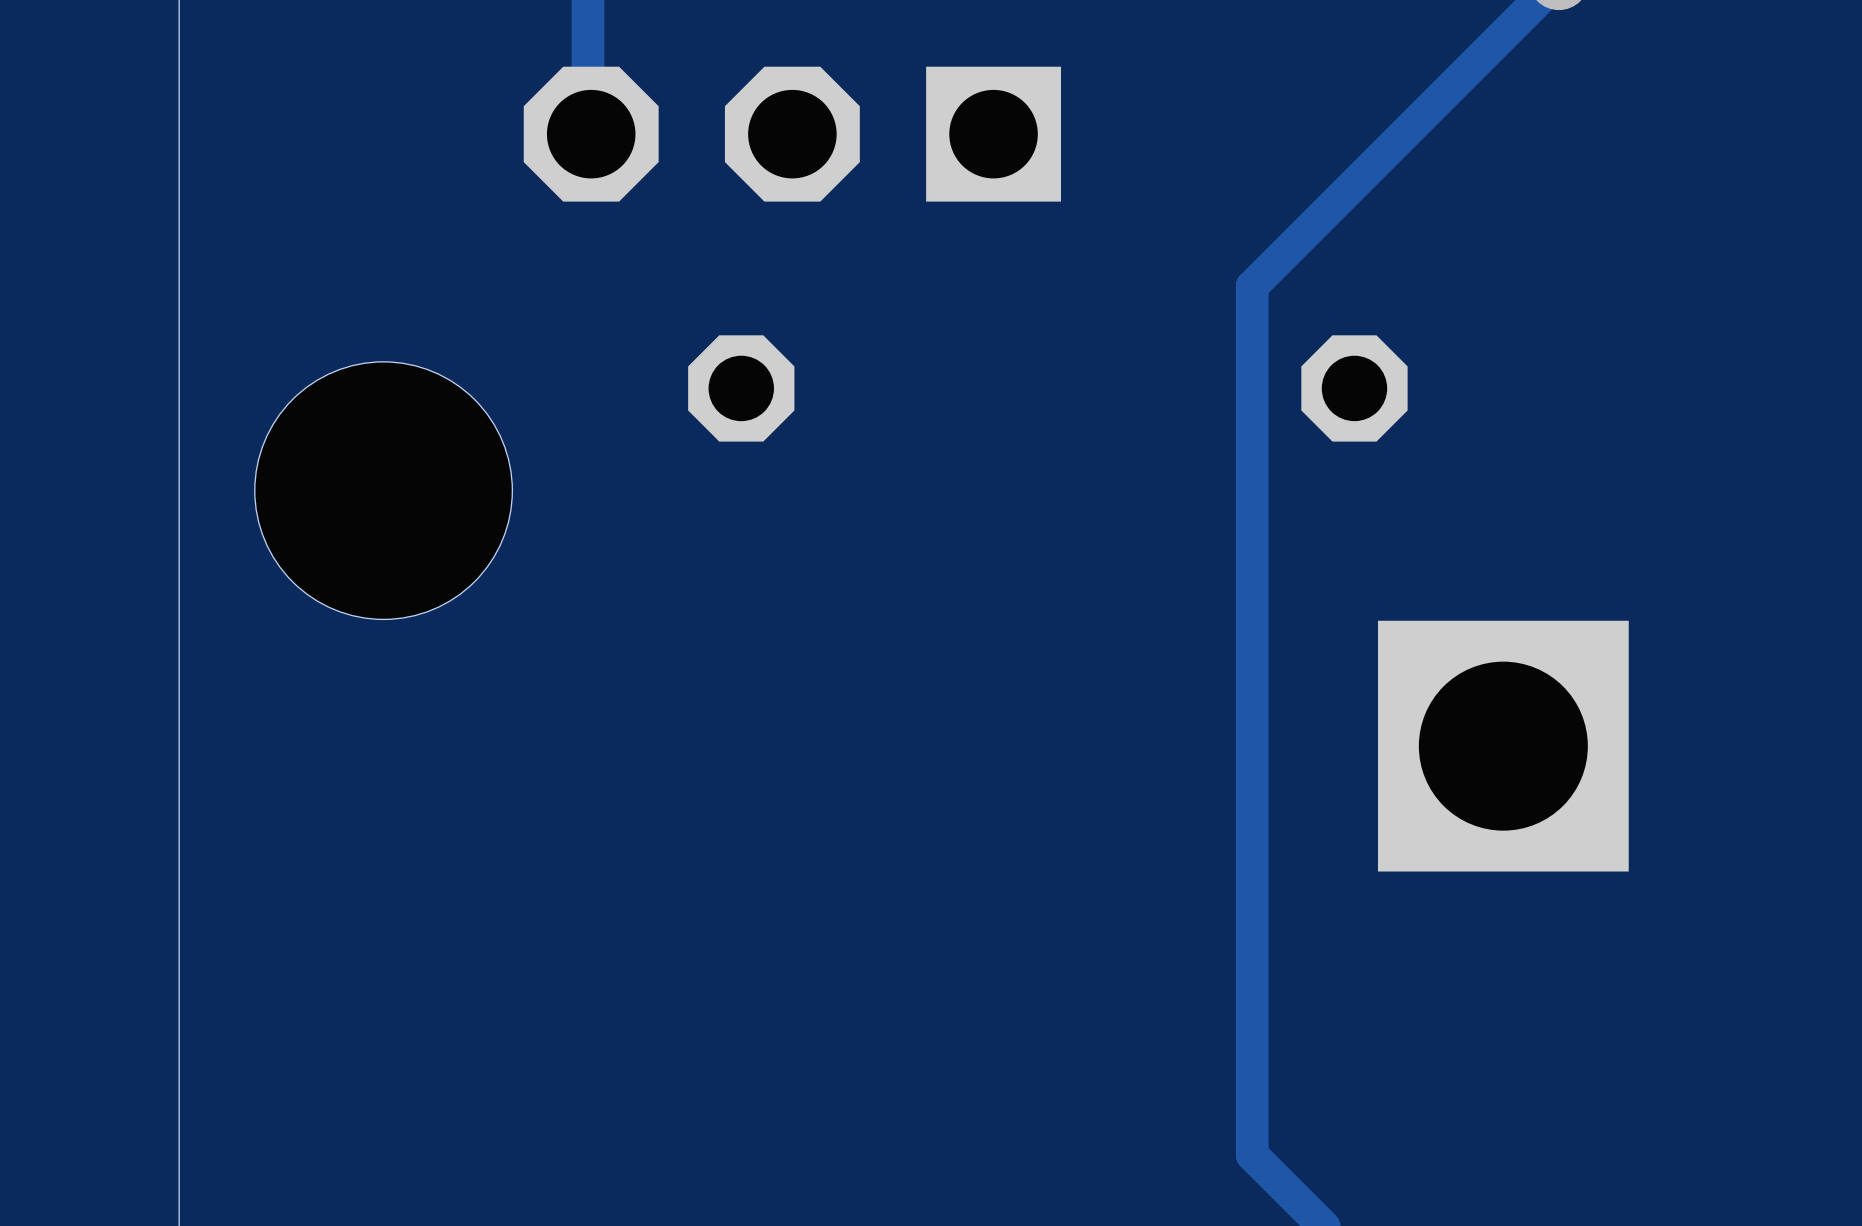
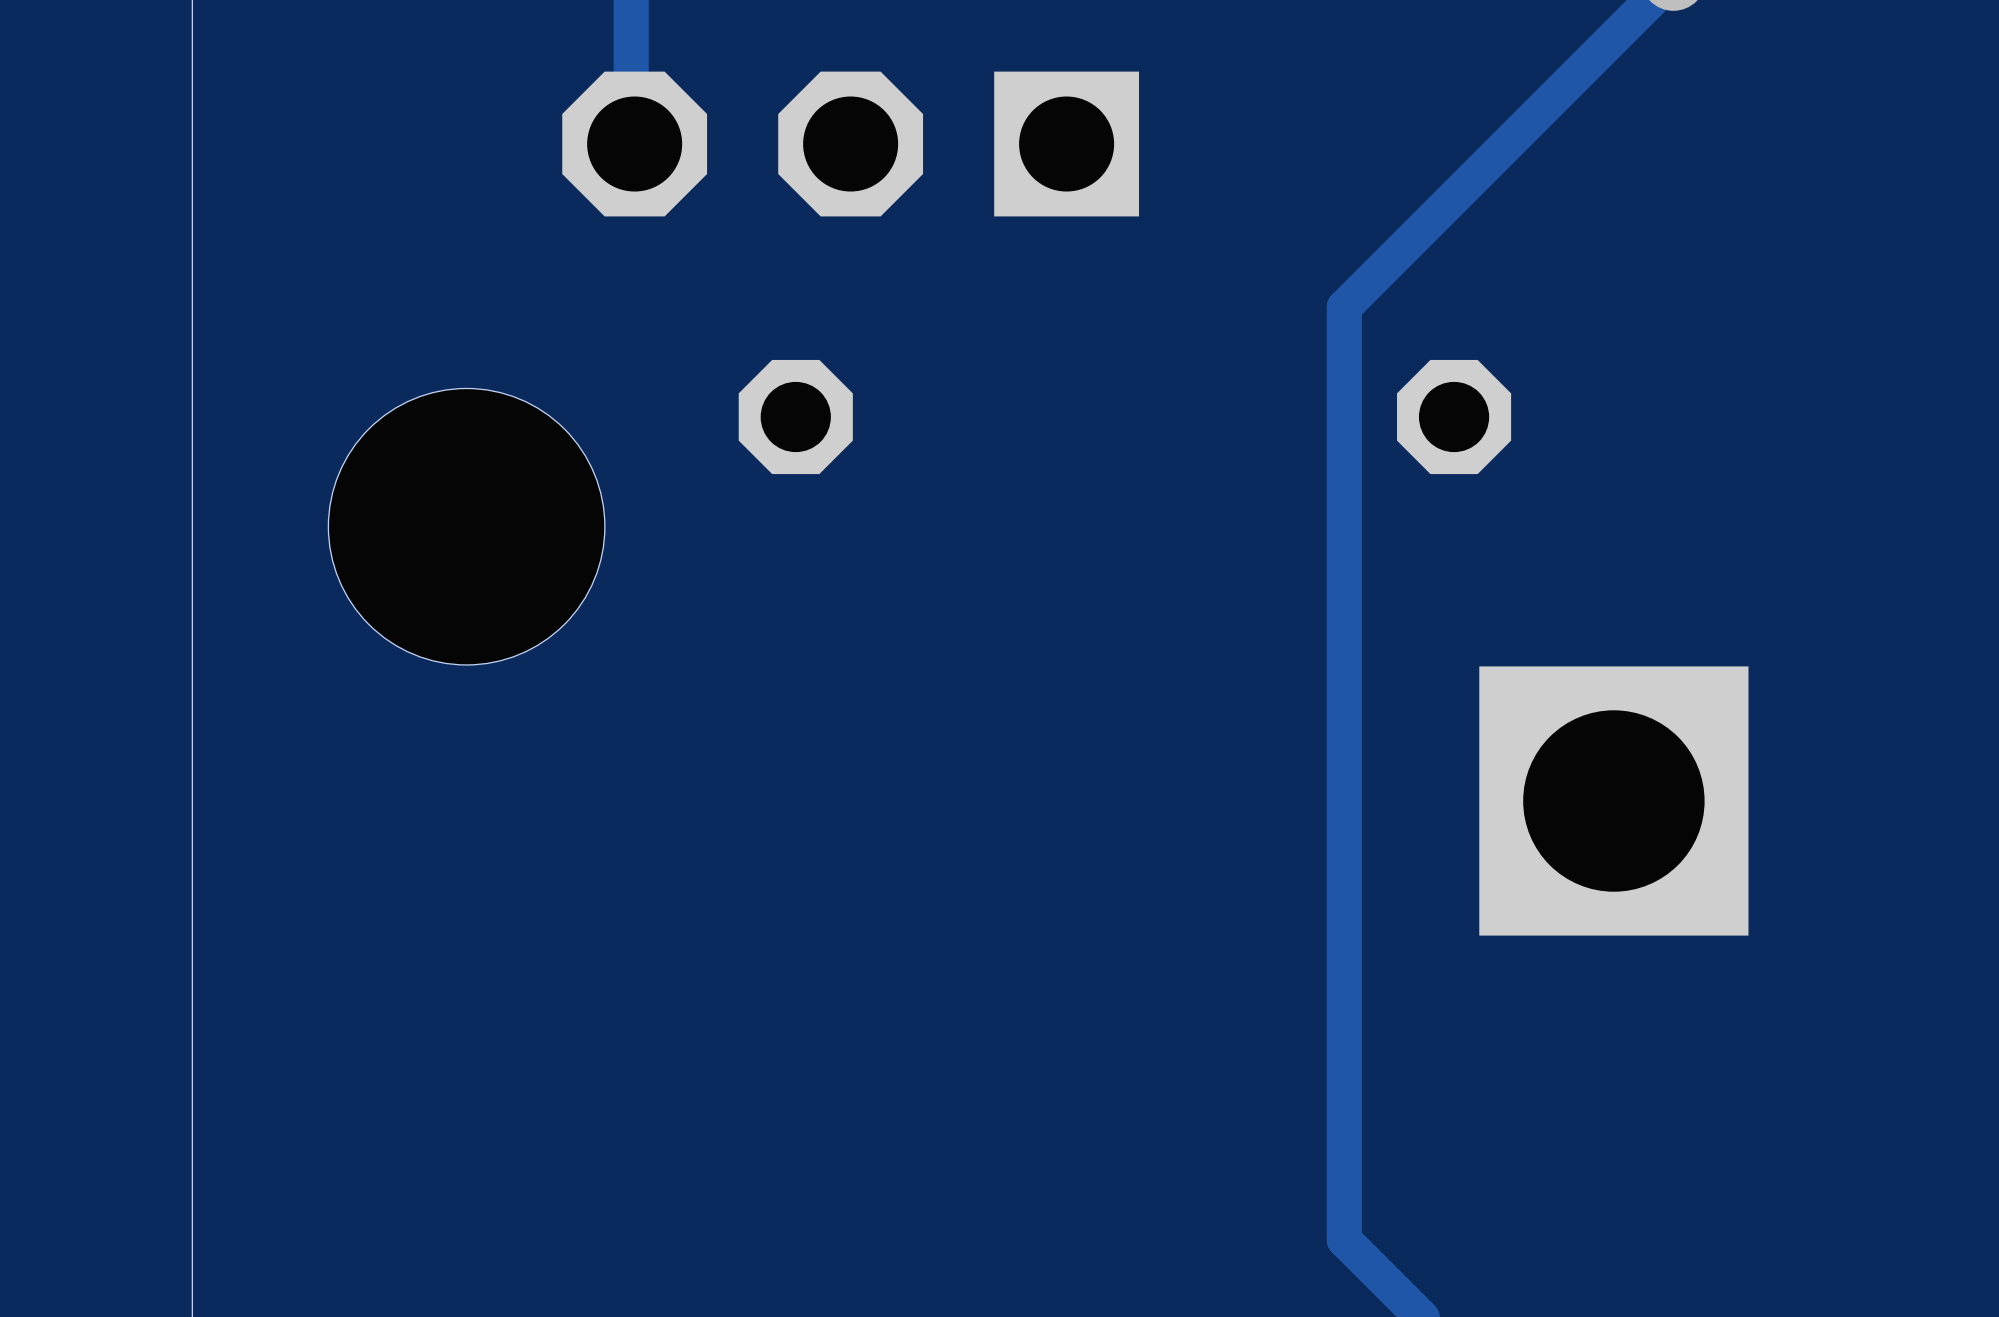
hole position: (383, 490) -> (466, 526)

